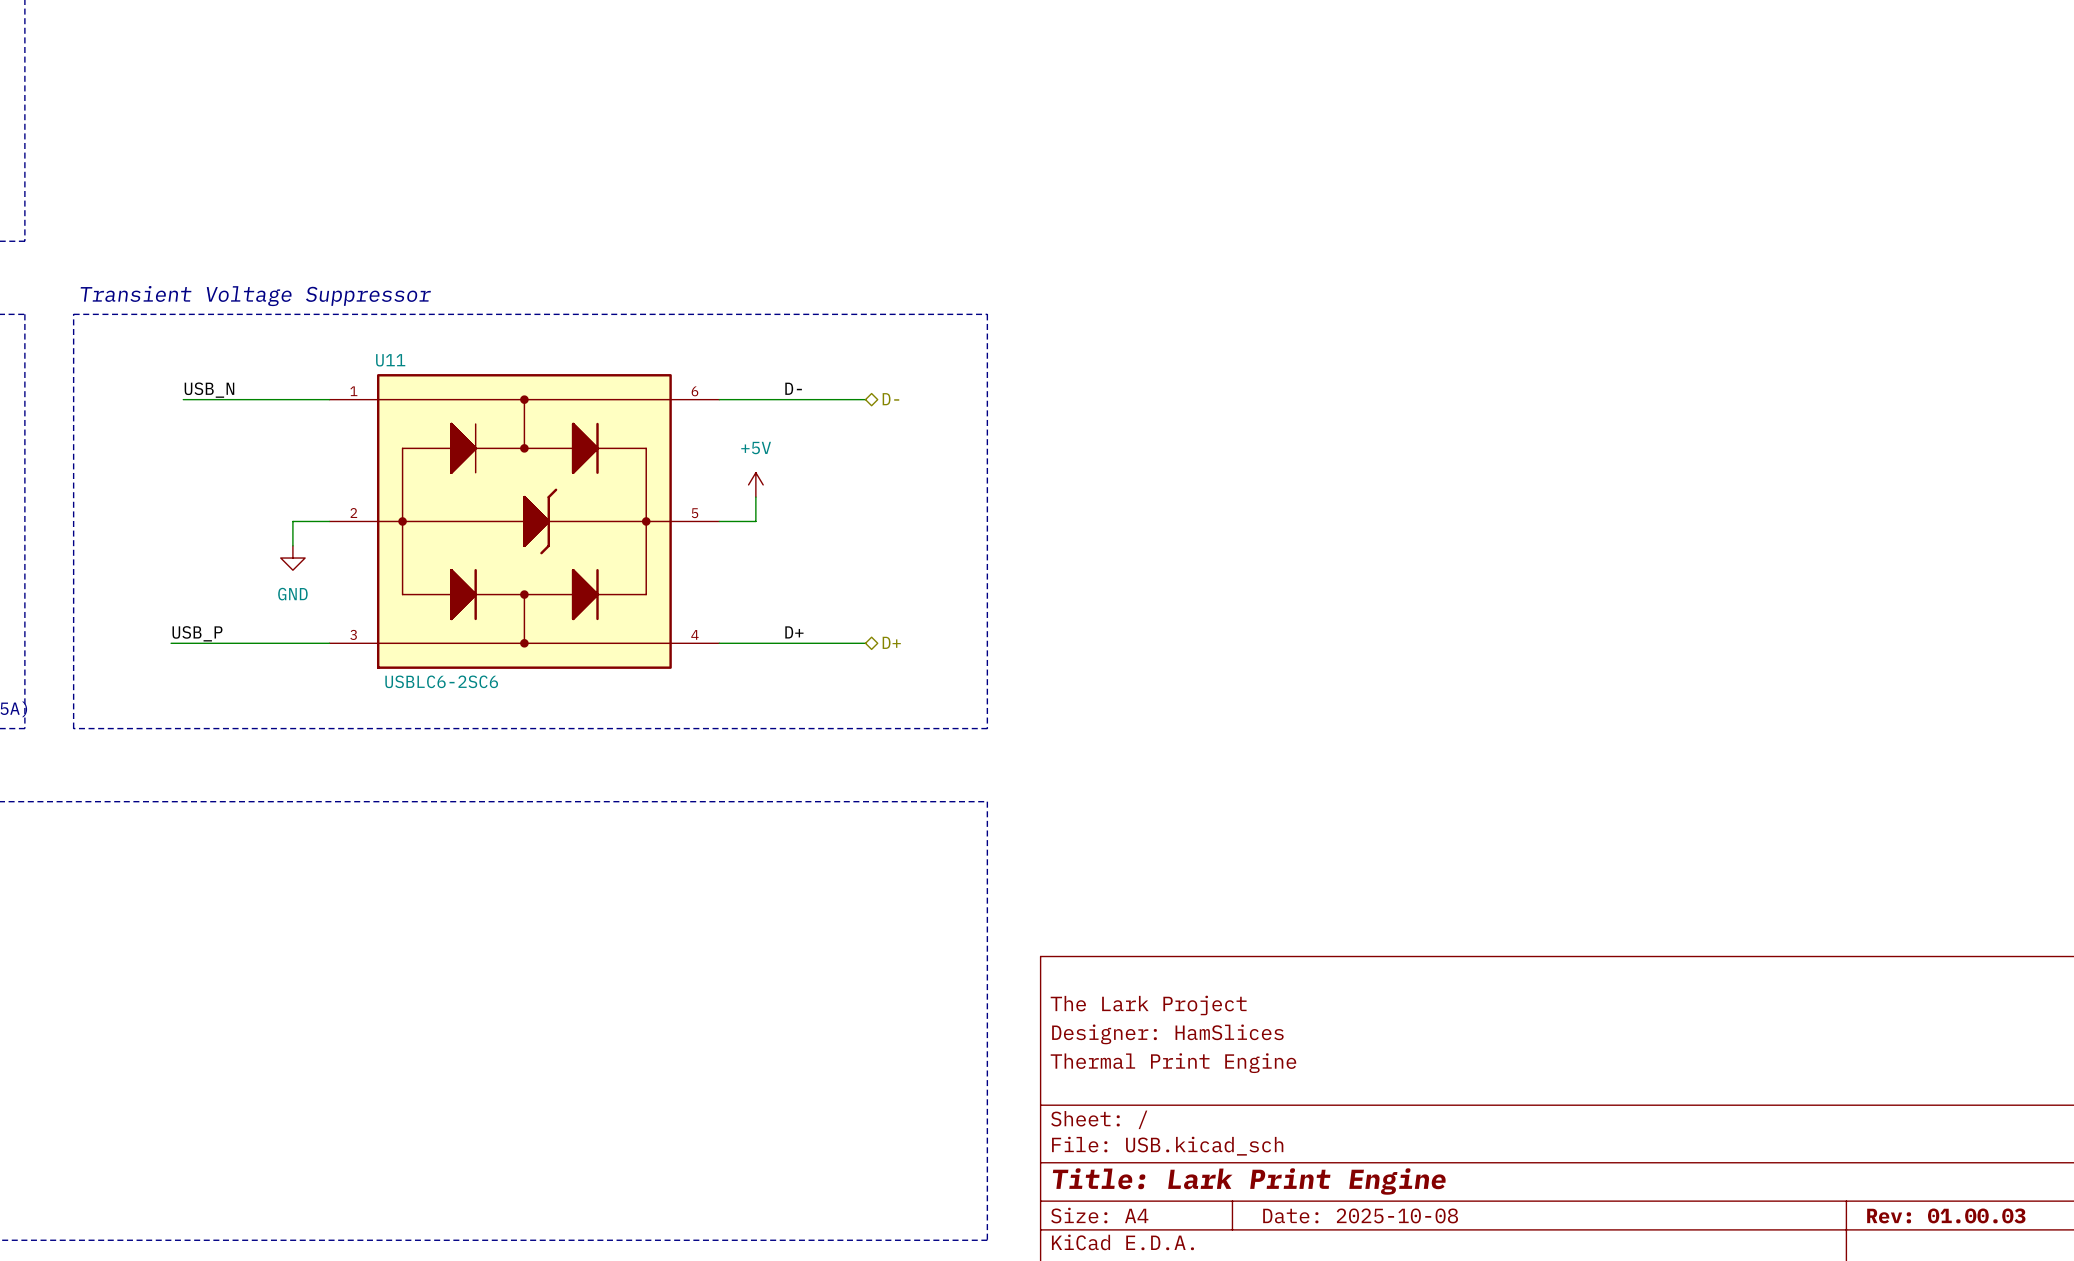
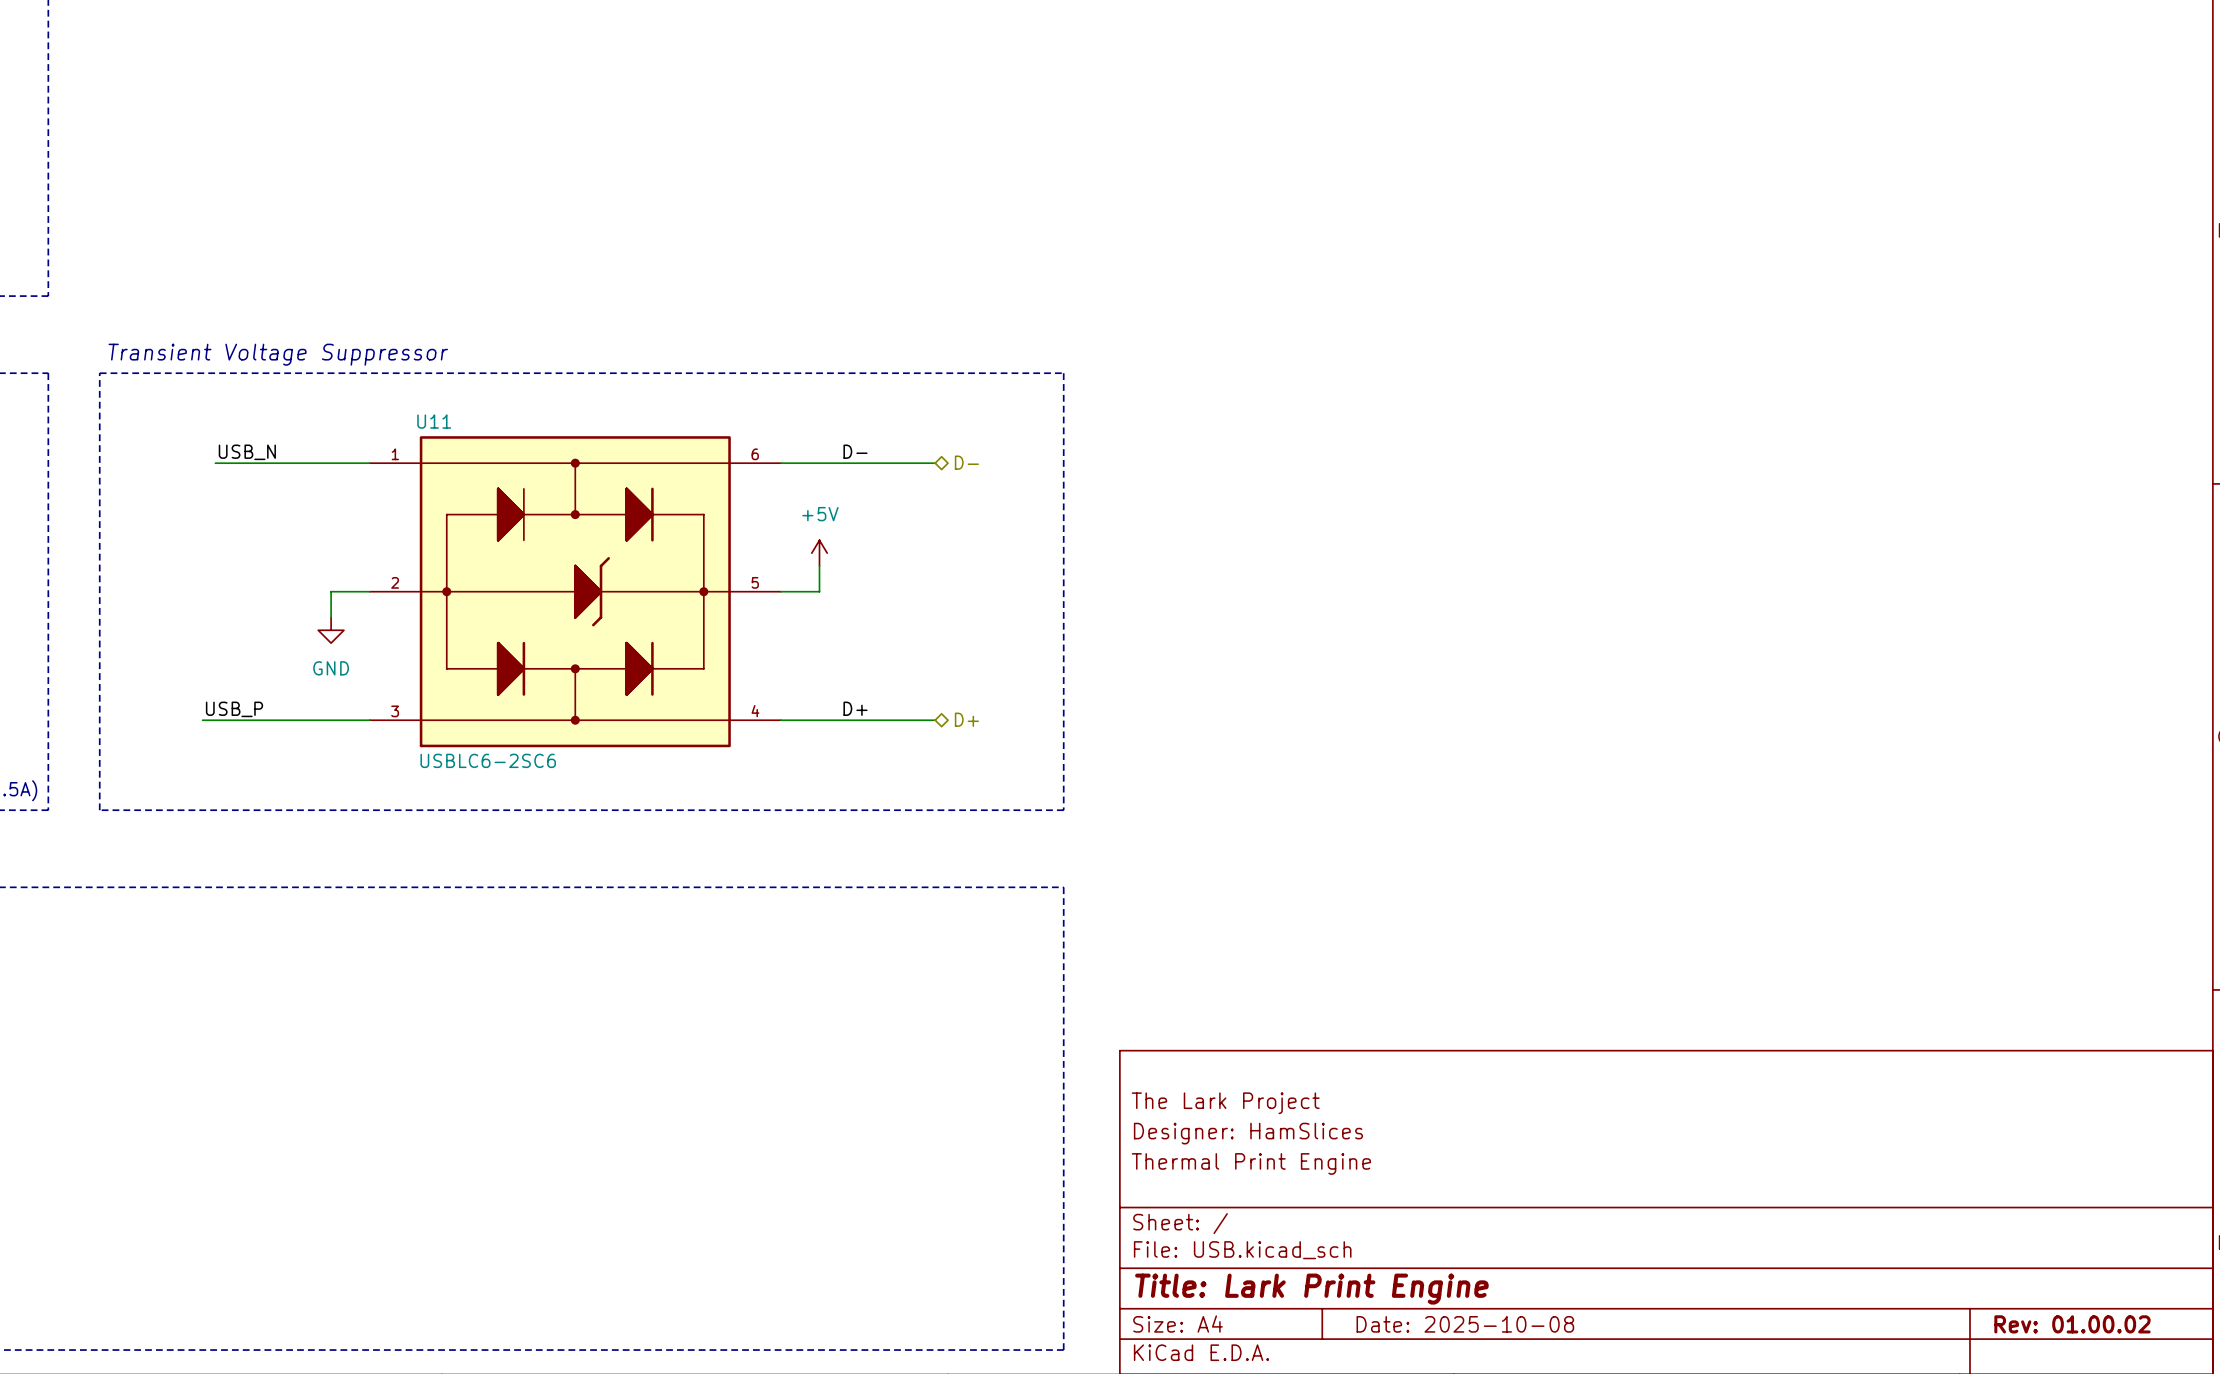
title block: Rev: 01.00.03 (1946, 1215) -> Rev: 01.00.02 (2072, 1324)

